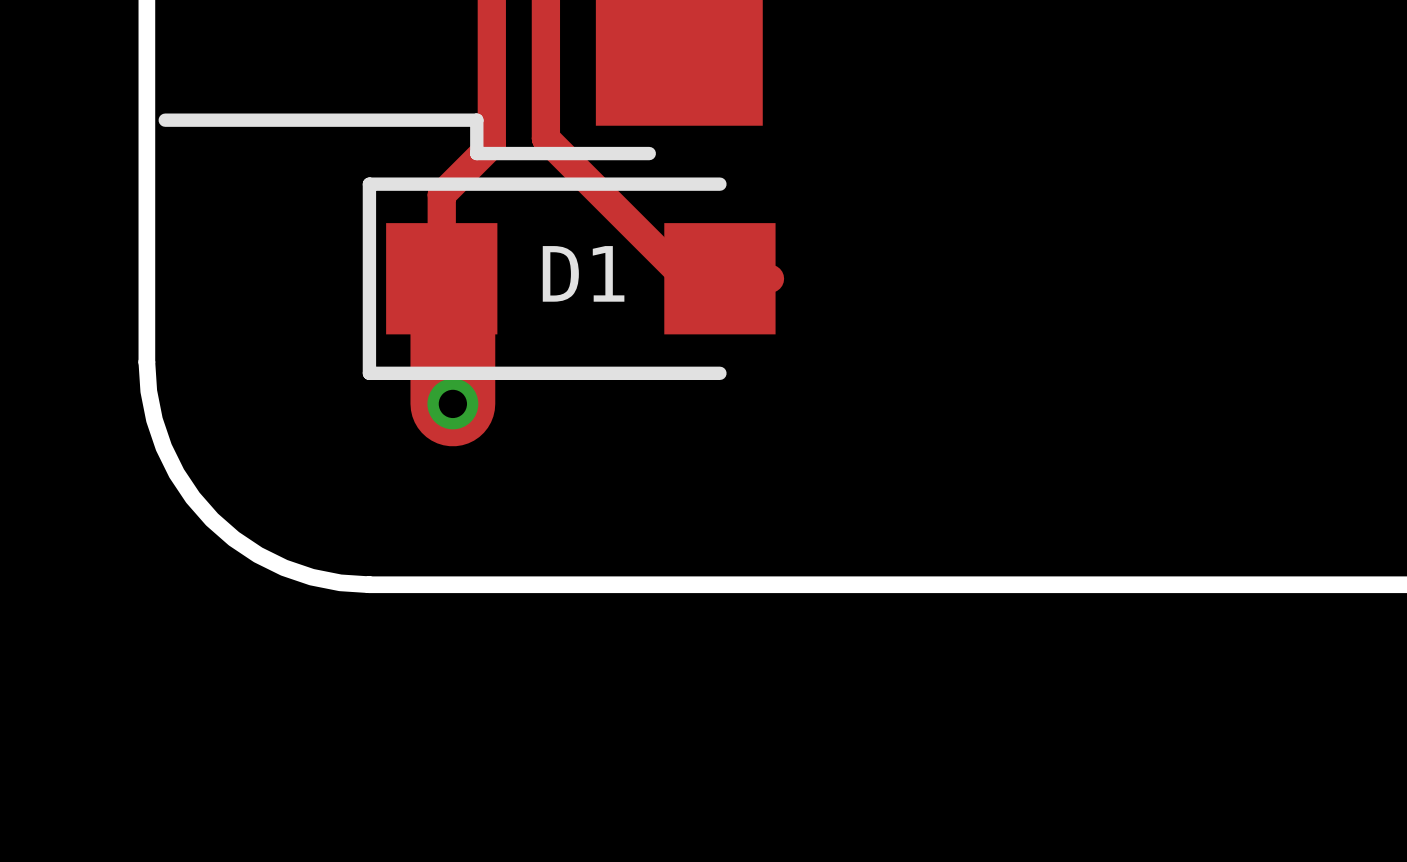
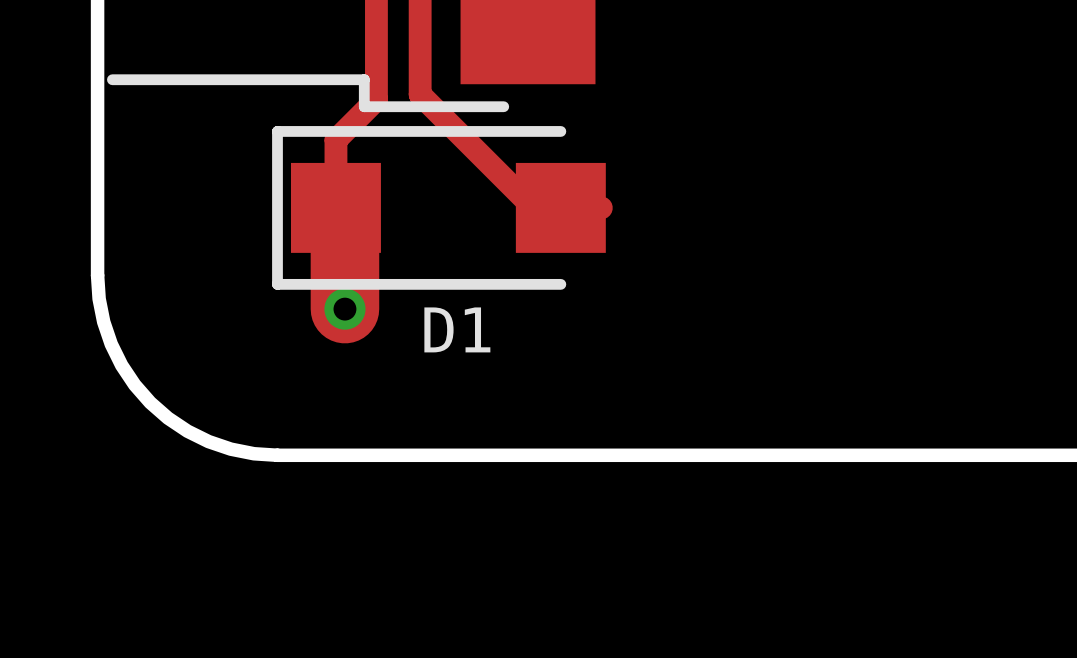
D1 name position: D1 (583, 273) -> D1 (457, 329)

